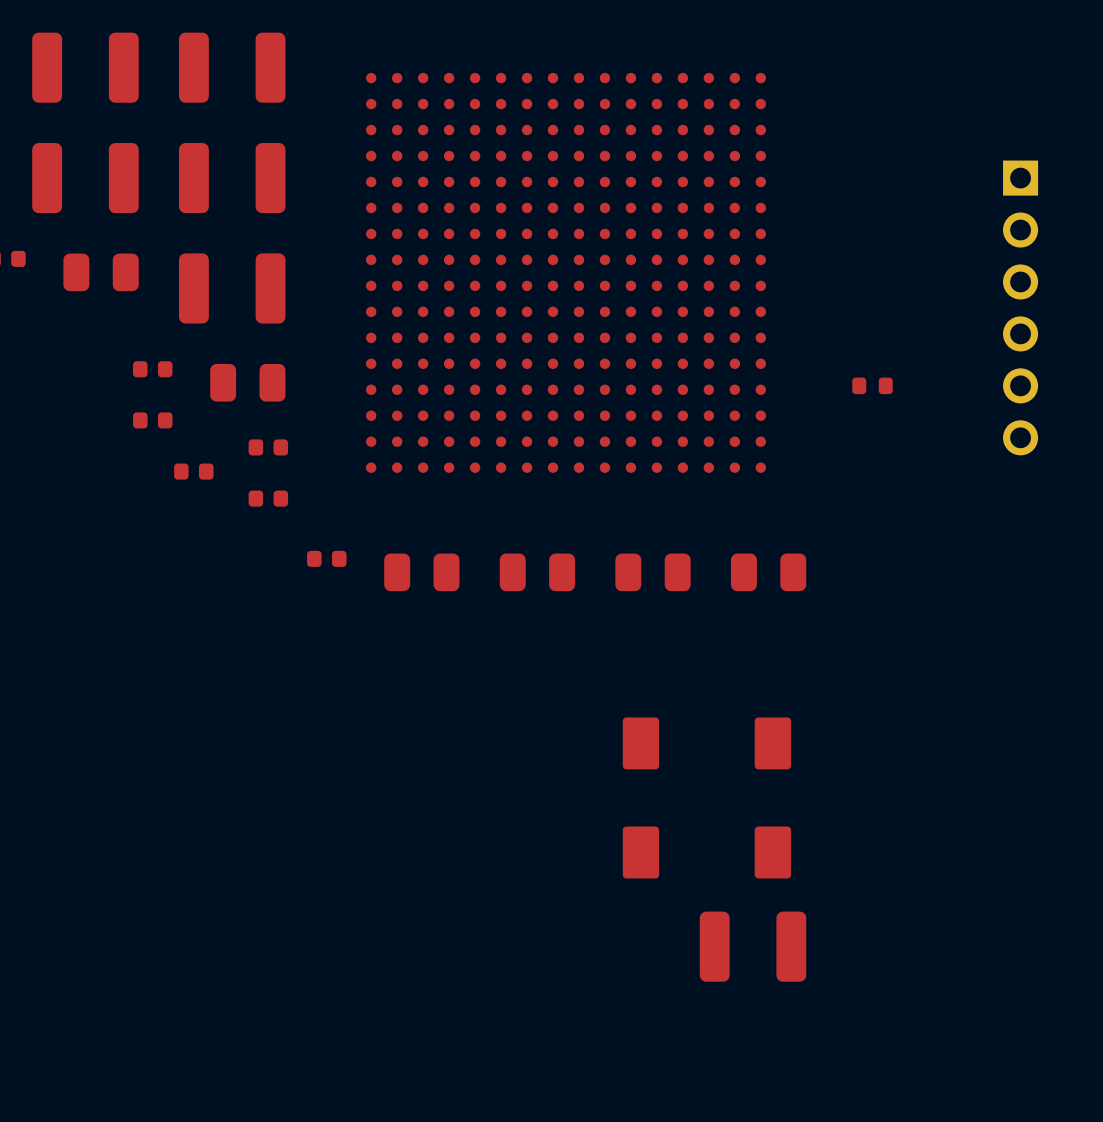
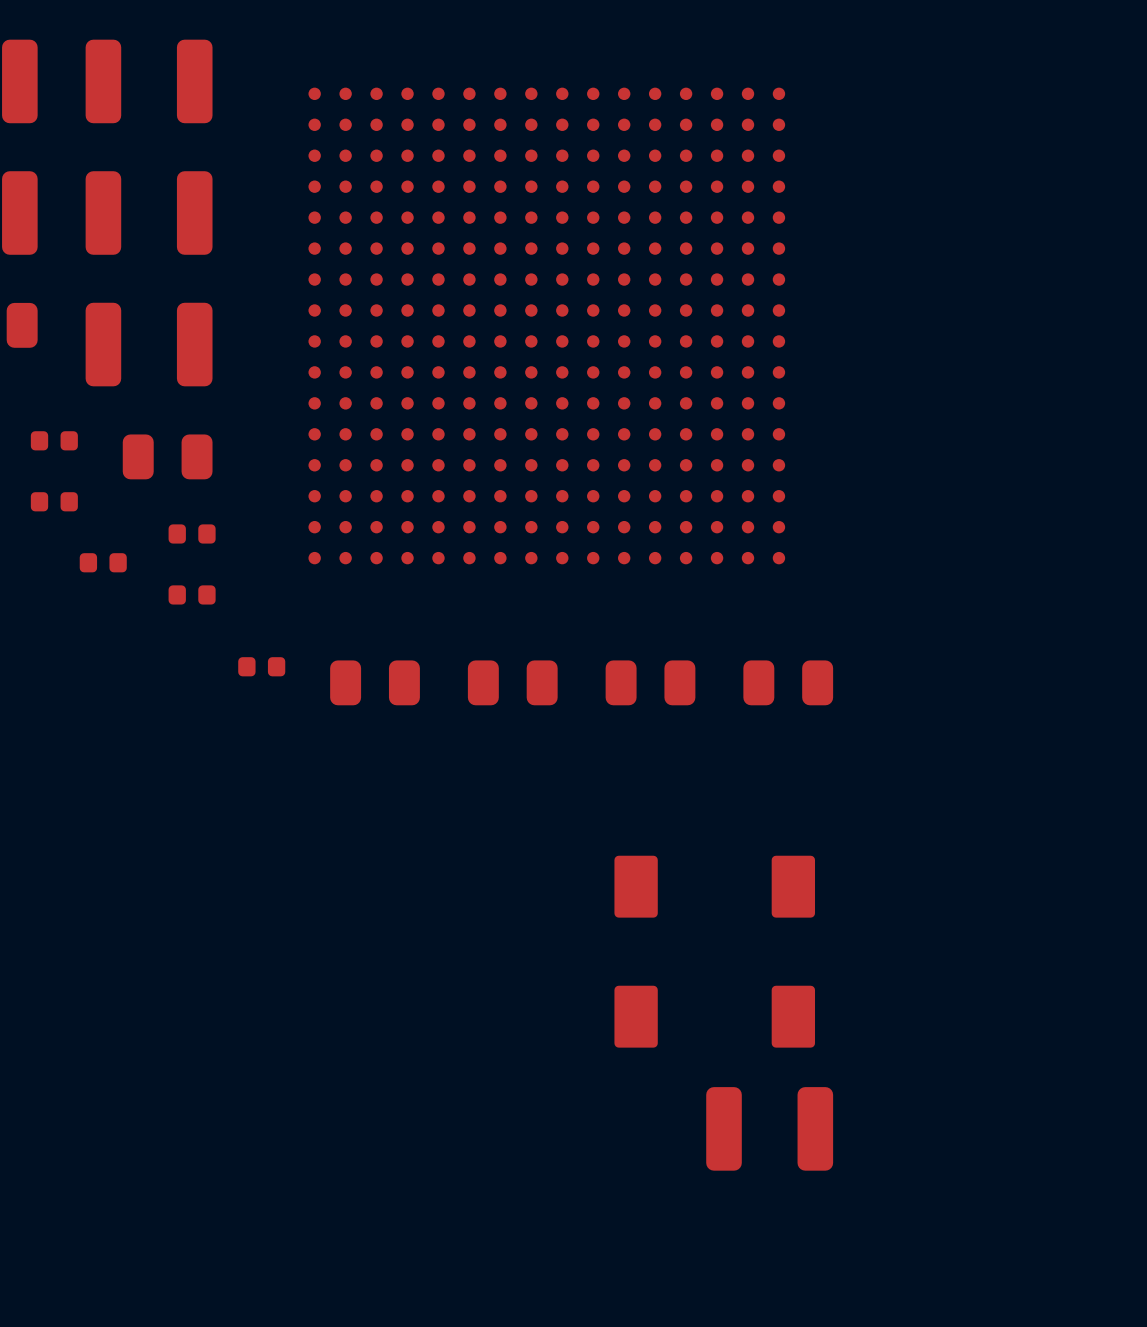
part: (1020, 307) -> none
part: (872, 385) -> none

